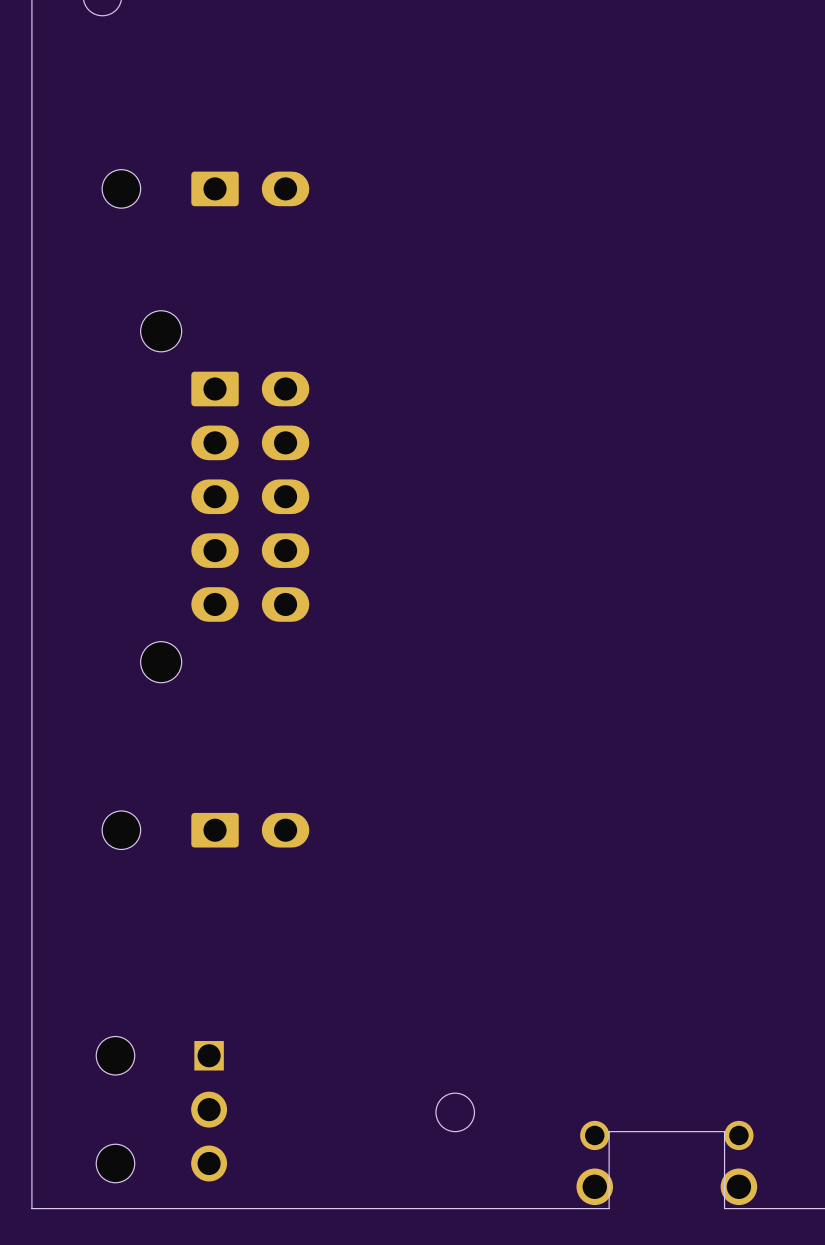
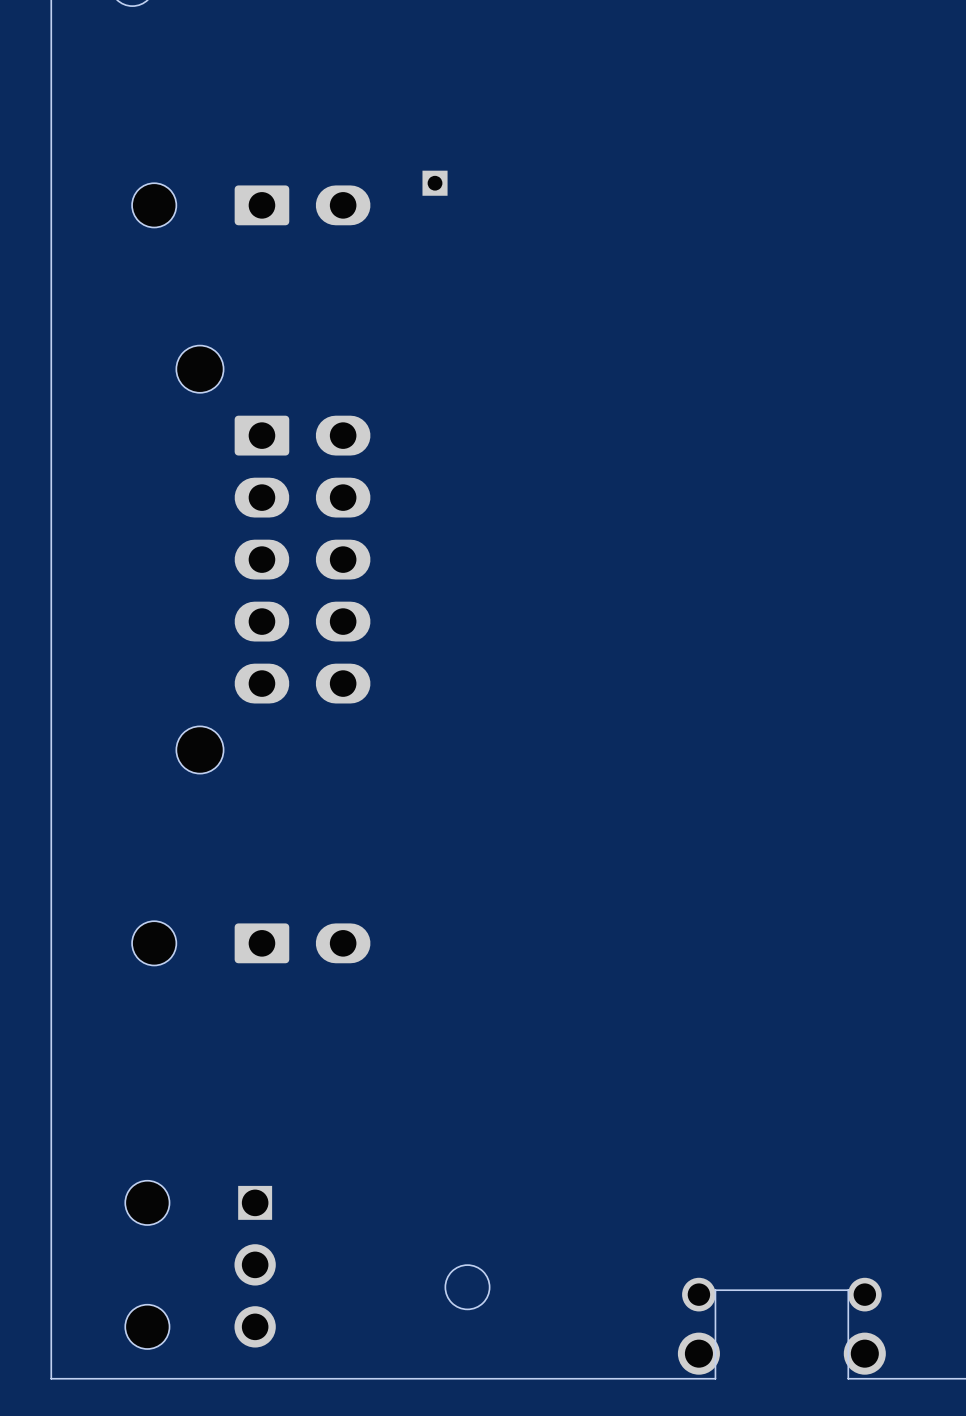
part: none -> (435, 183)
round board edge position: (455, 1112) -> (467, 1287)

